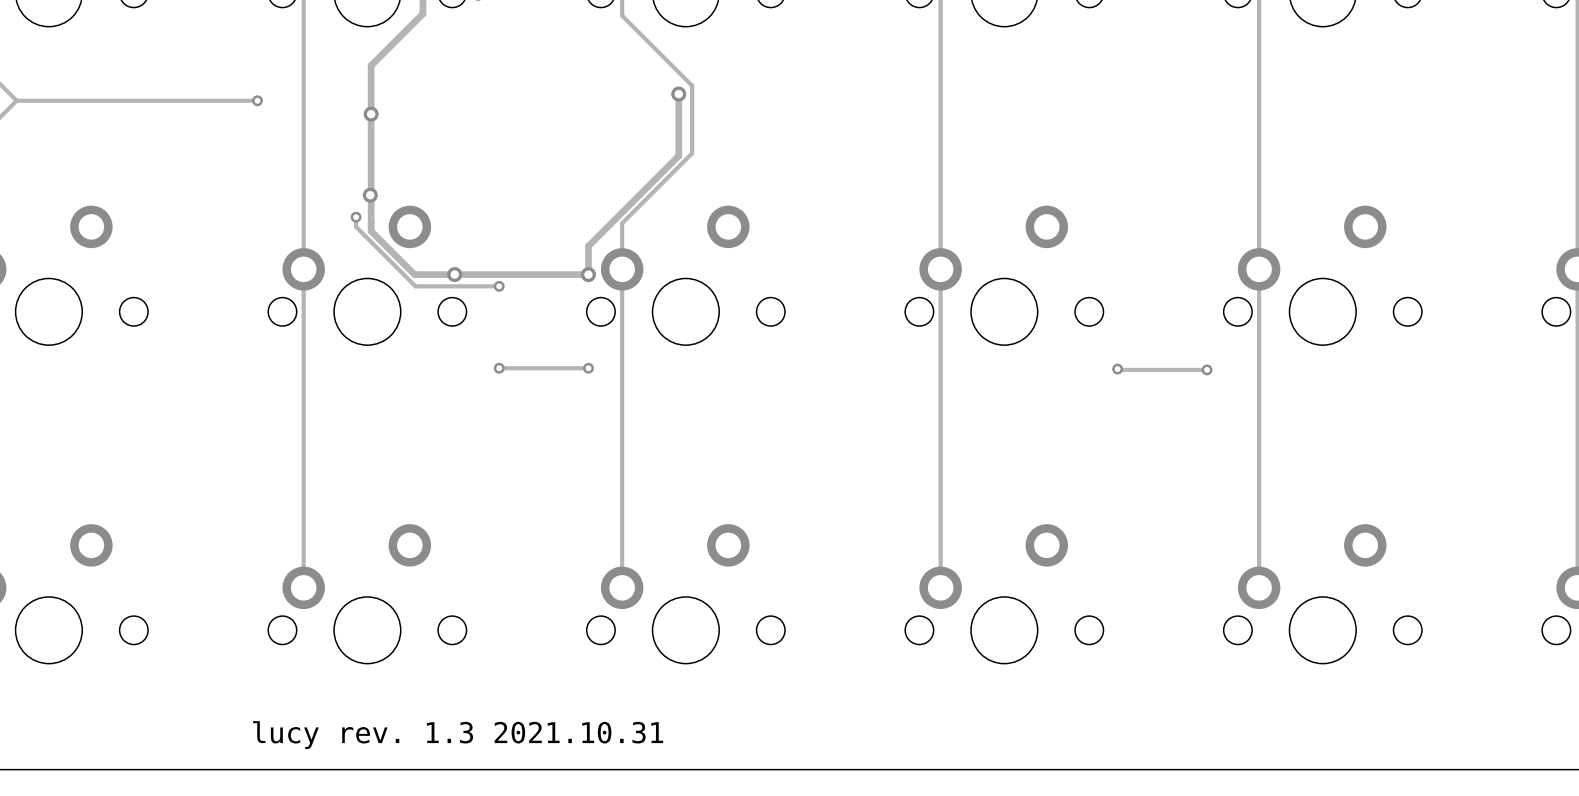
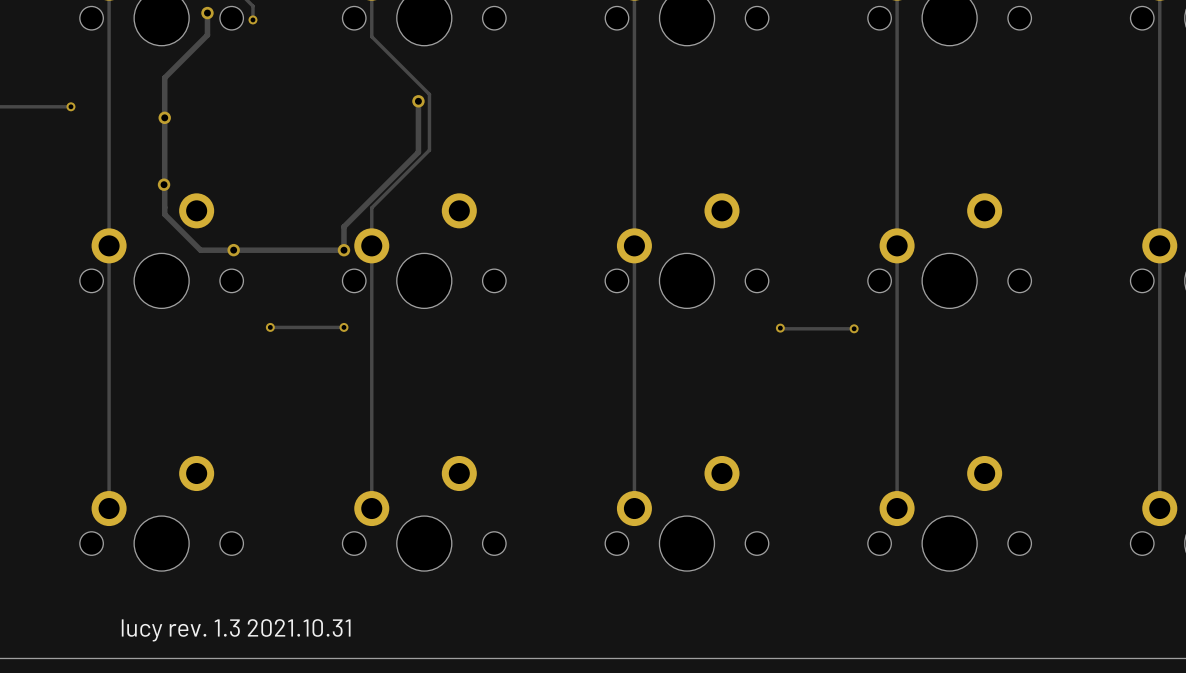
track: (356, 217) (356, 226) (415, 286) (499, 286) -> none
via: (356, 217) -> none
via: (499, 286) -> none

